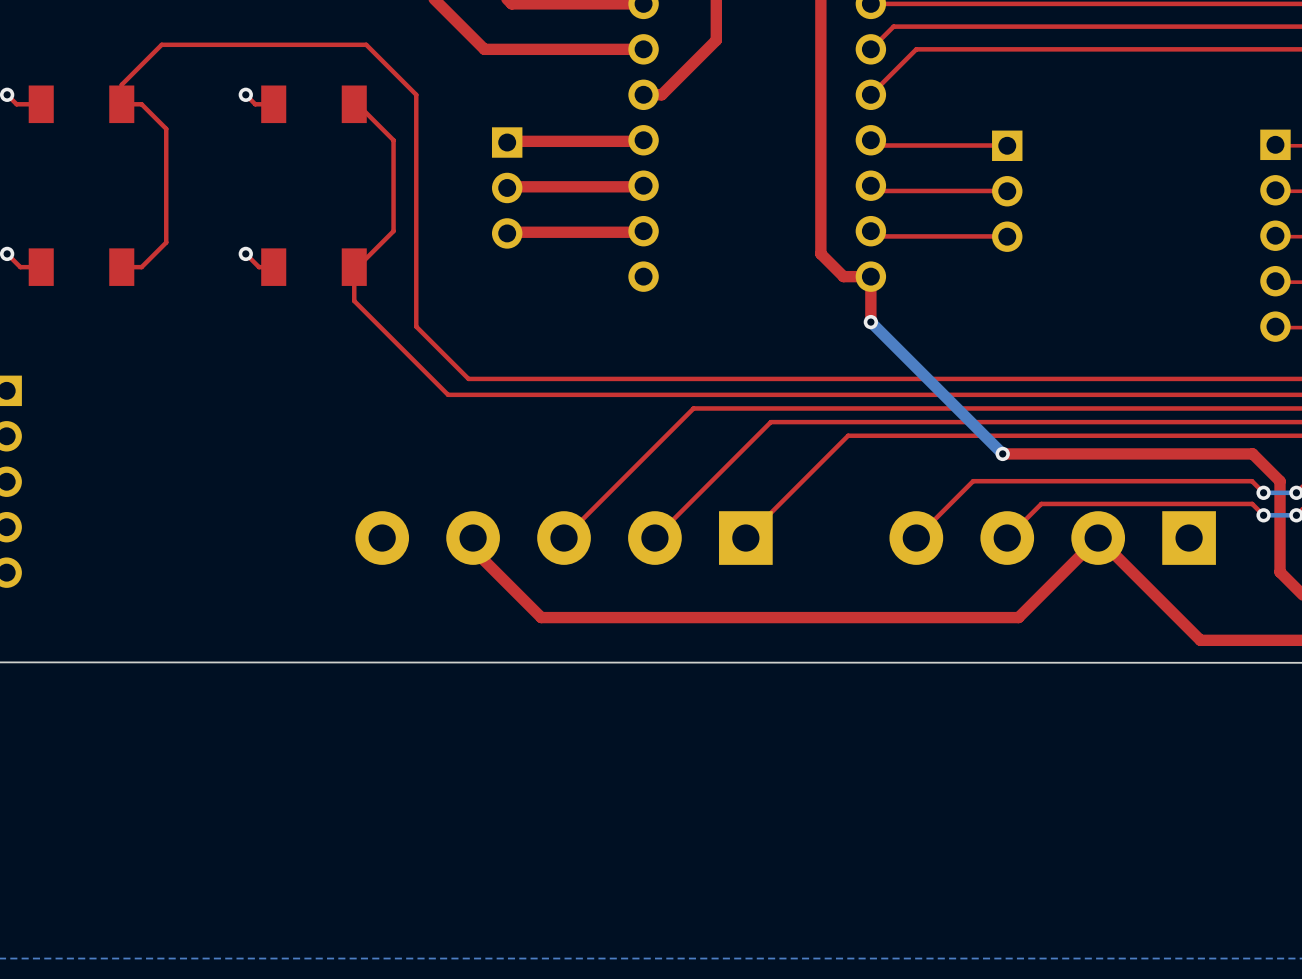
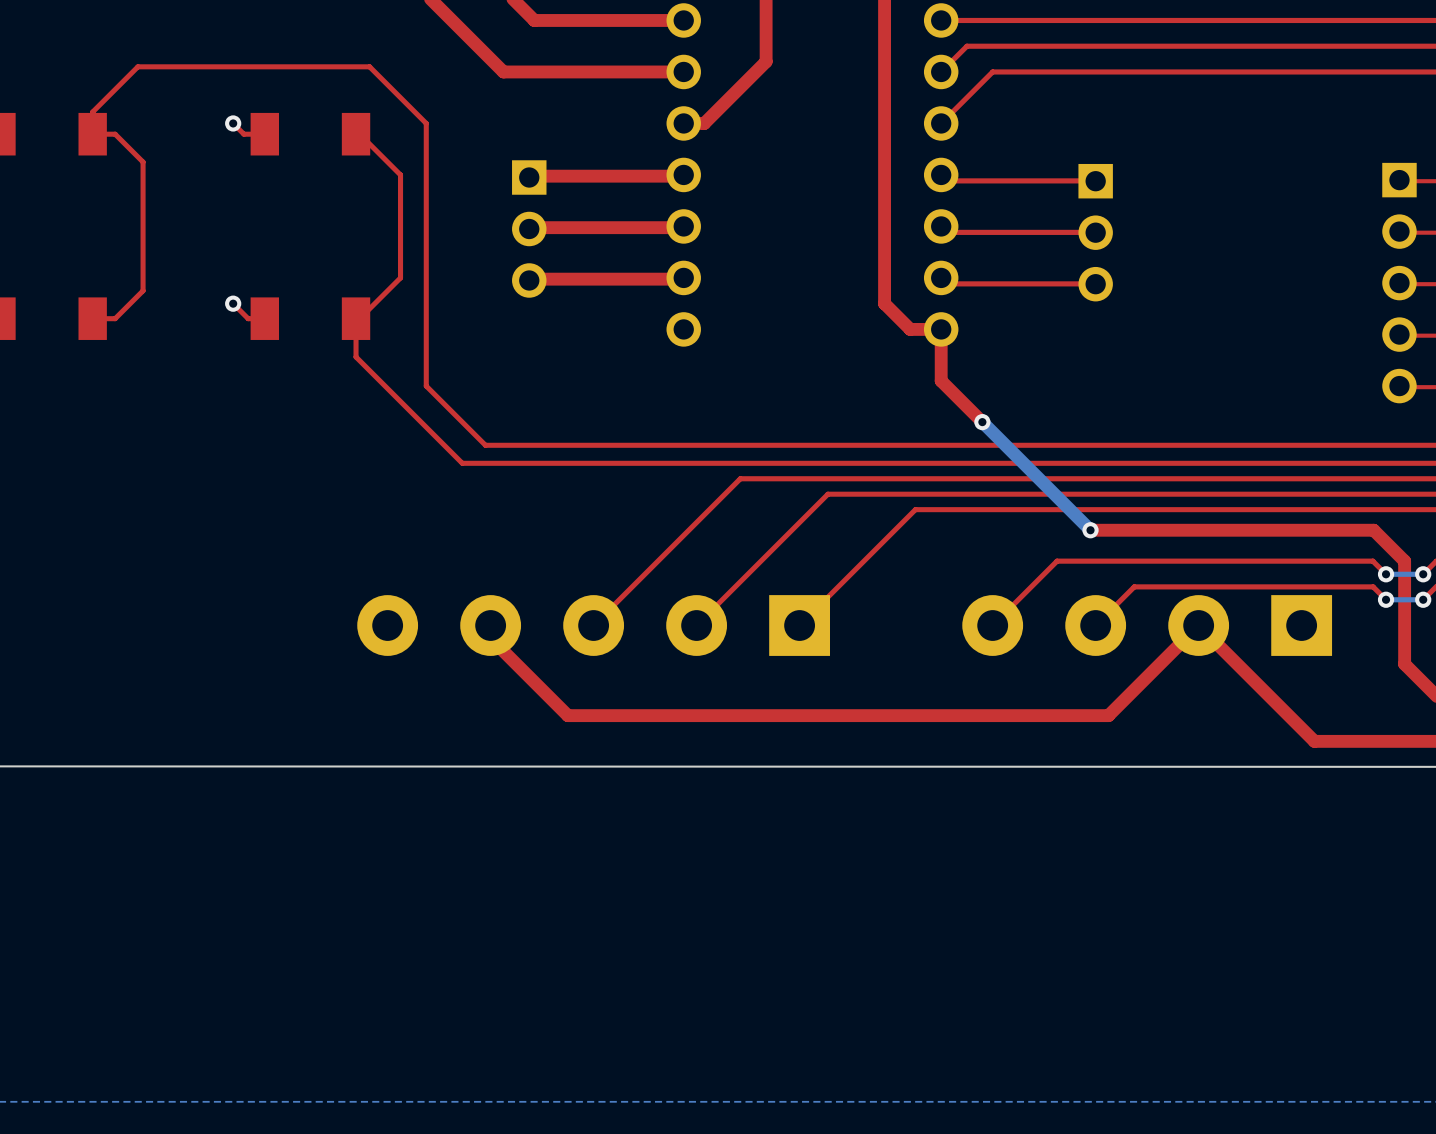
top track: none -> (941, 380) (982, 422)
bottom track: (870, 322) (907, 358) -> none
via position: (870, 322) -> (982, 422)

